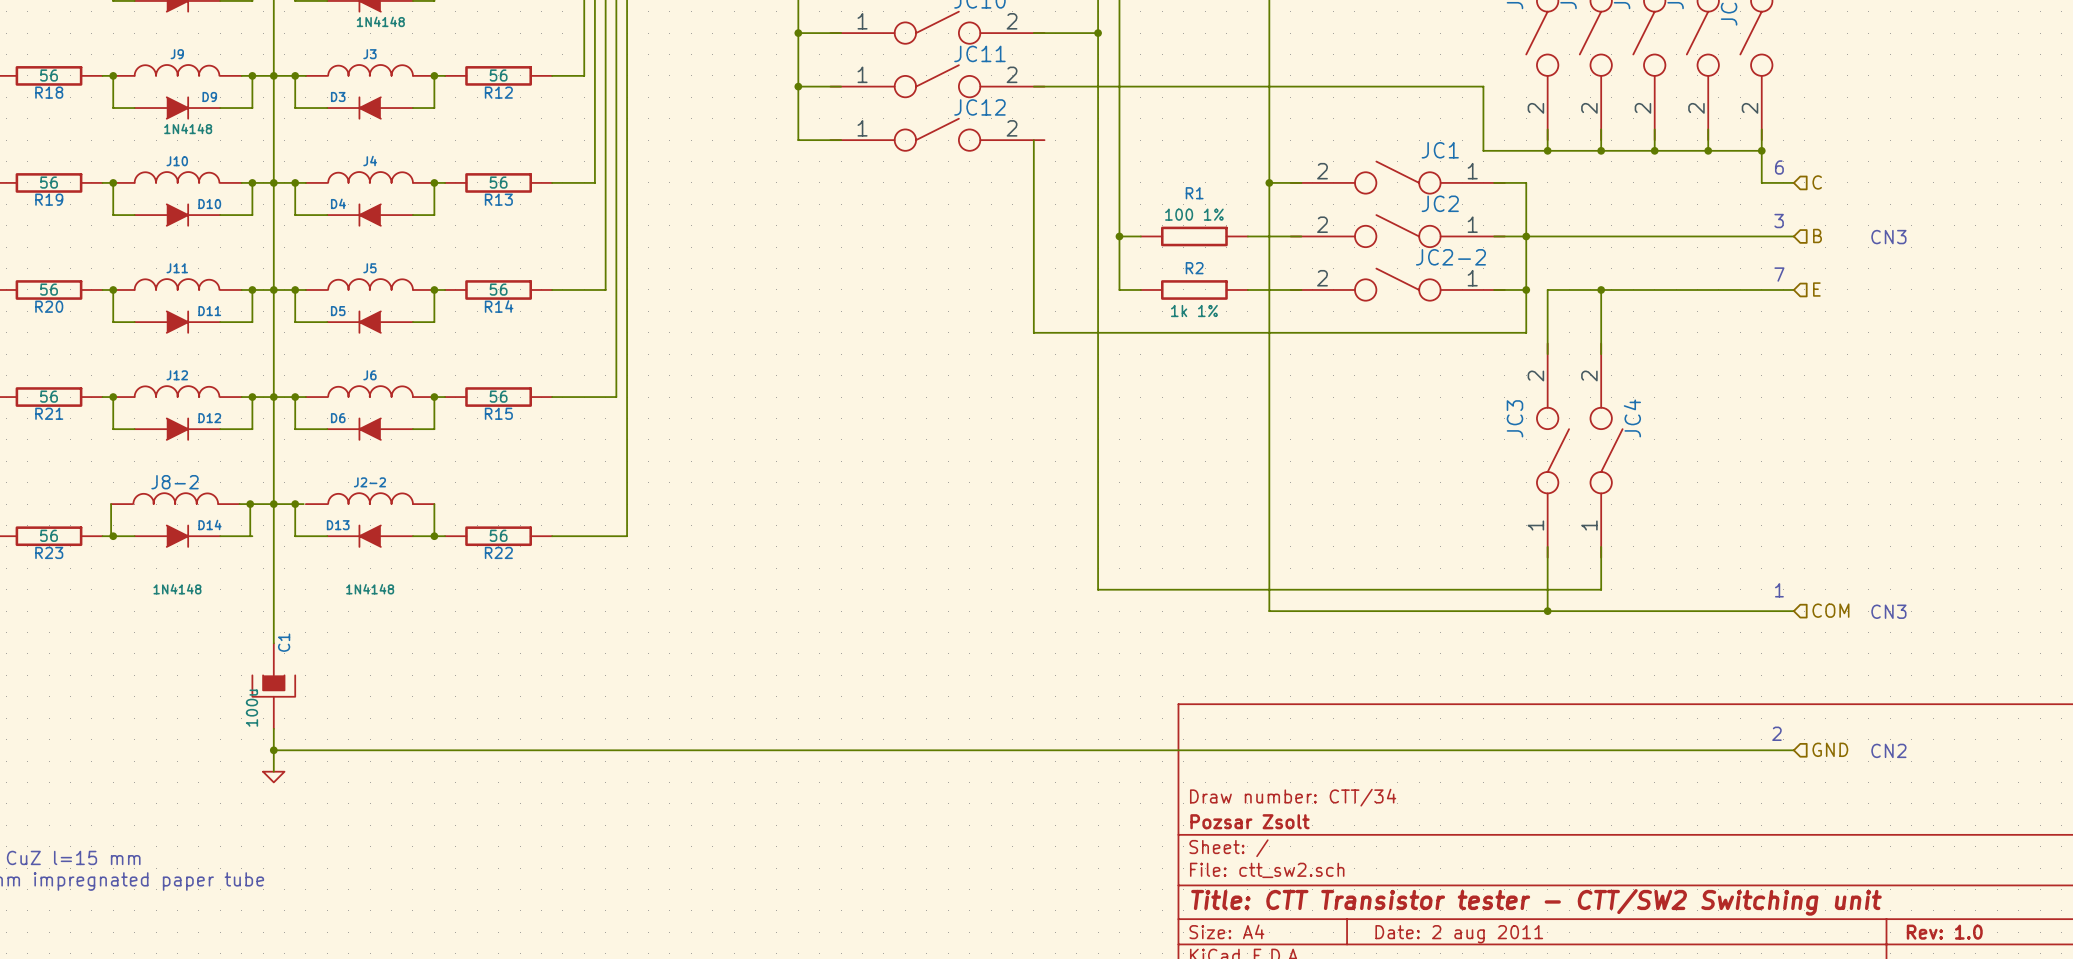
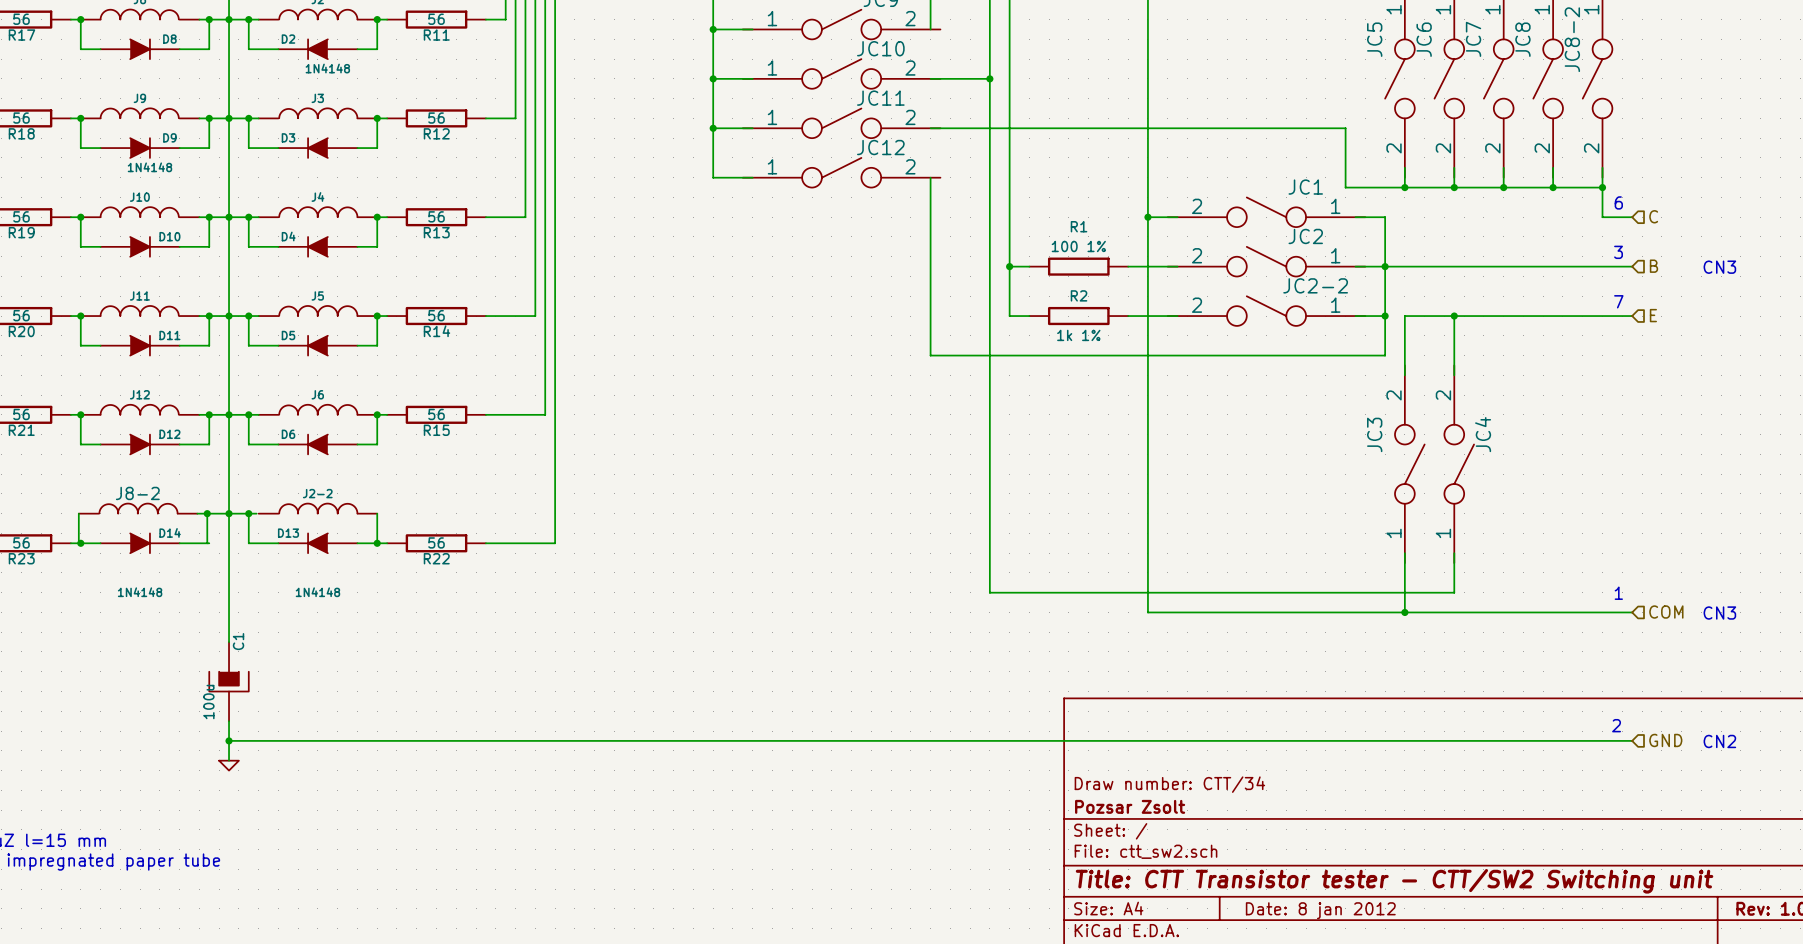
title block: Date: 2 aug 2011 (1459, 934) -> Date: 8 jan 2012 (1320, 910)

